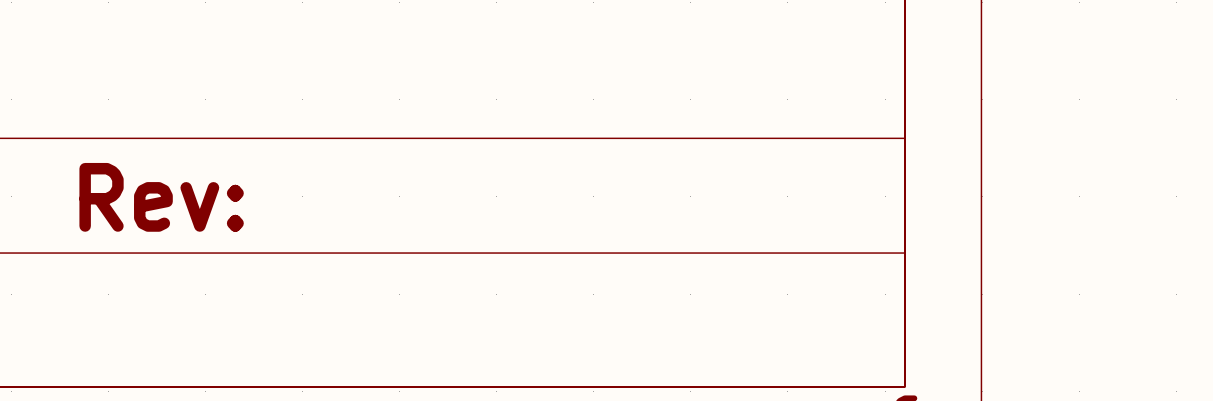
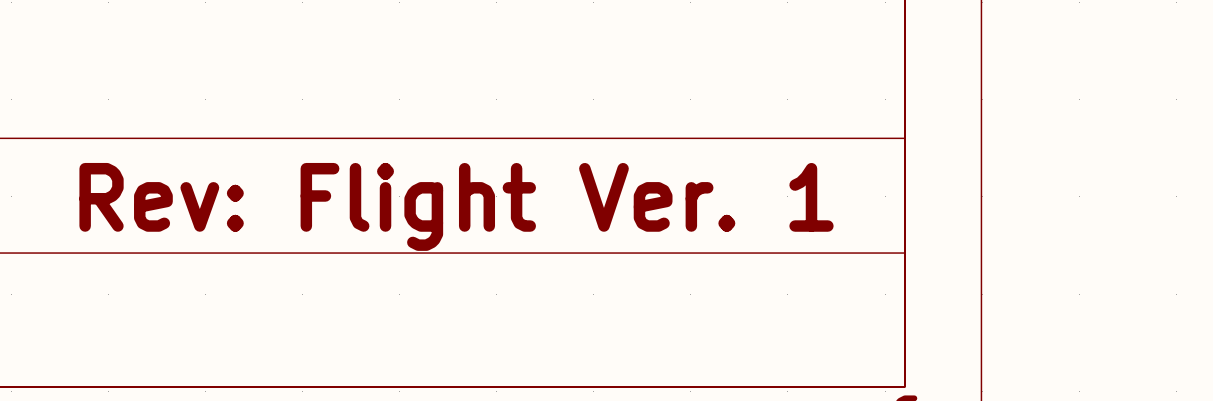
title block: Rev: (161, 197) -> Rev: Flight Ver. 1 (456, 206)

